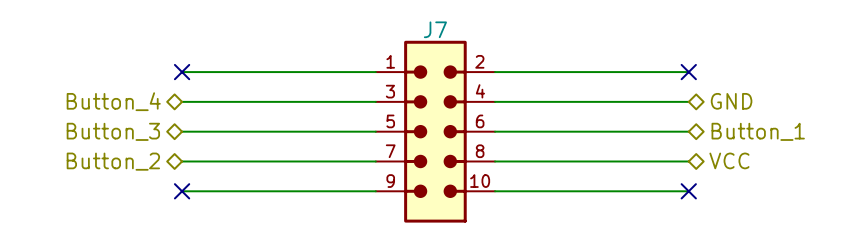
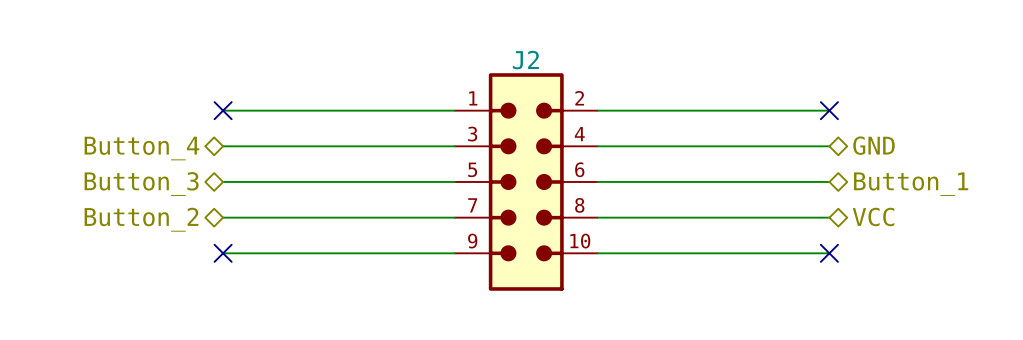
J7 name: J7 (435, 29) -> J2 (525, 60)

